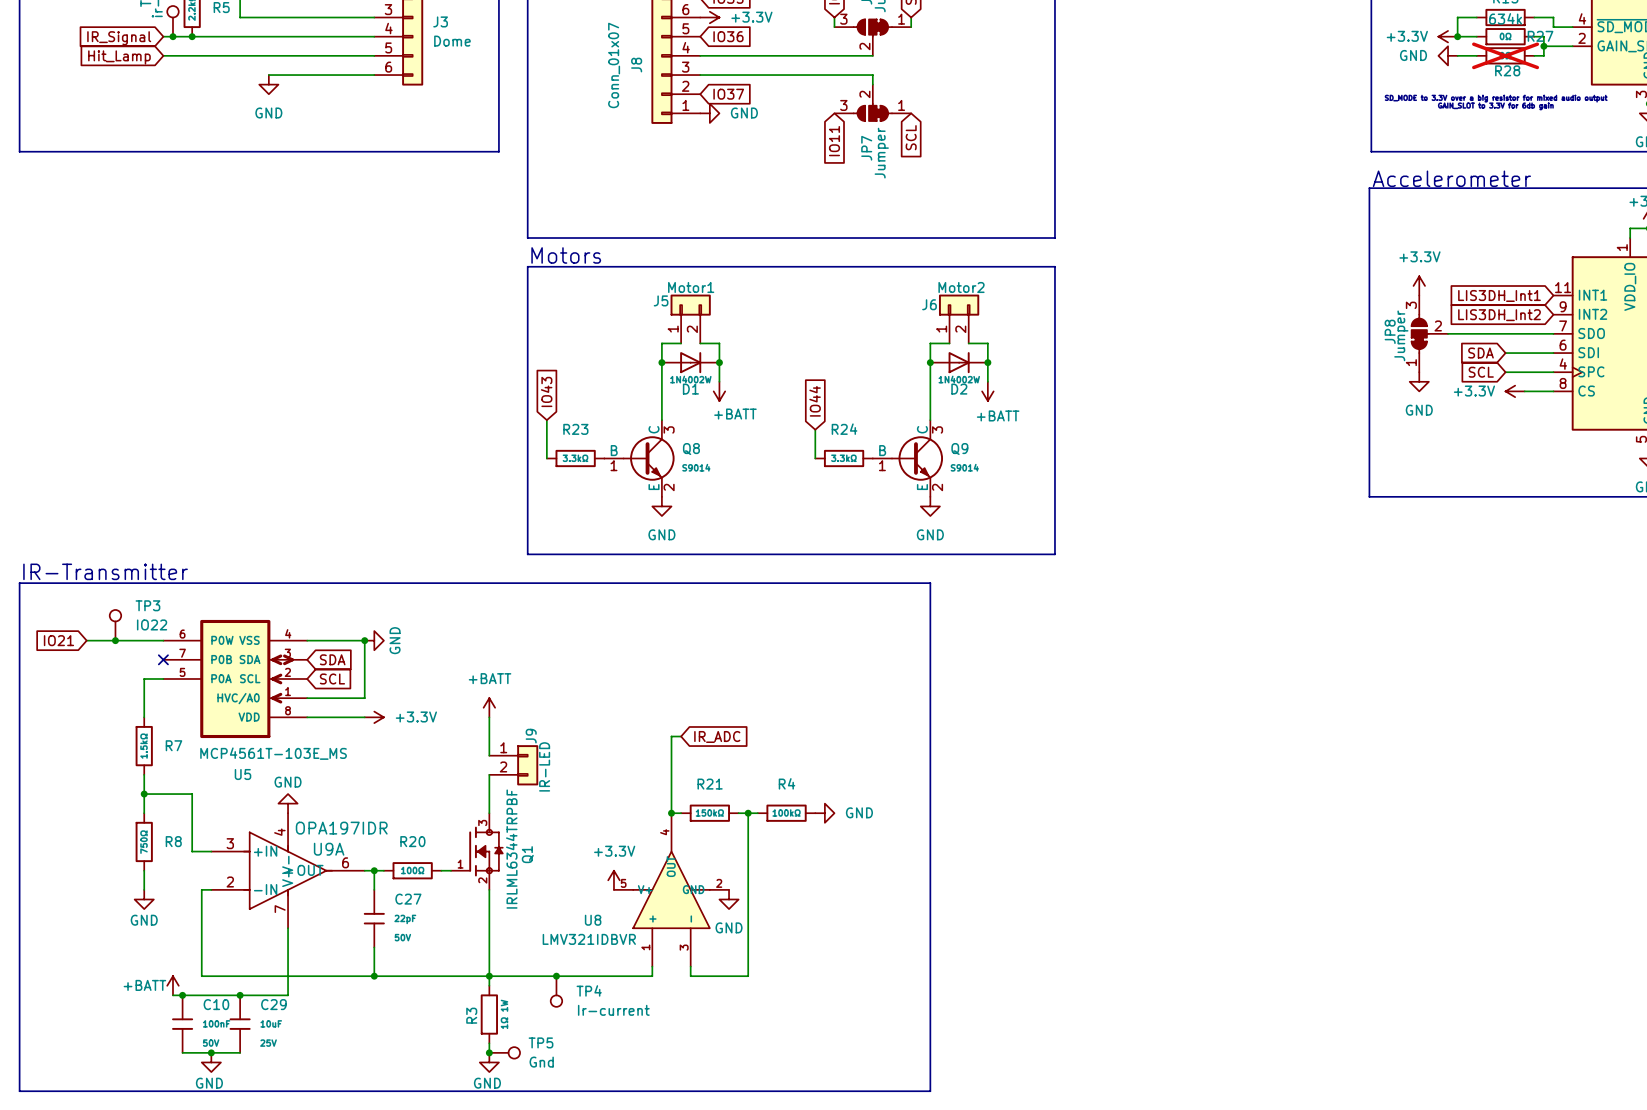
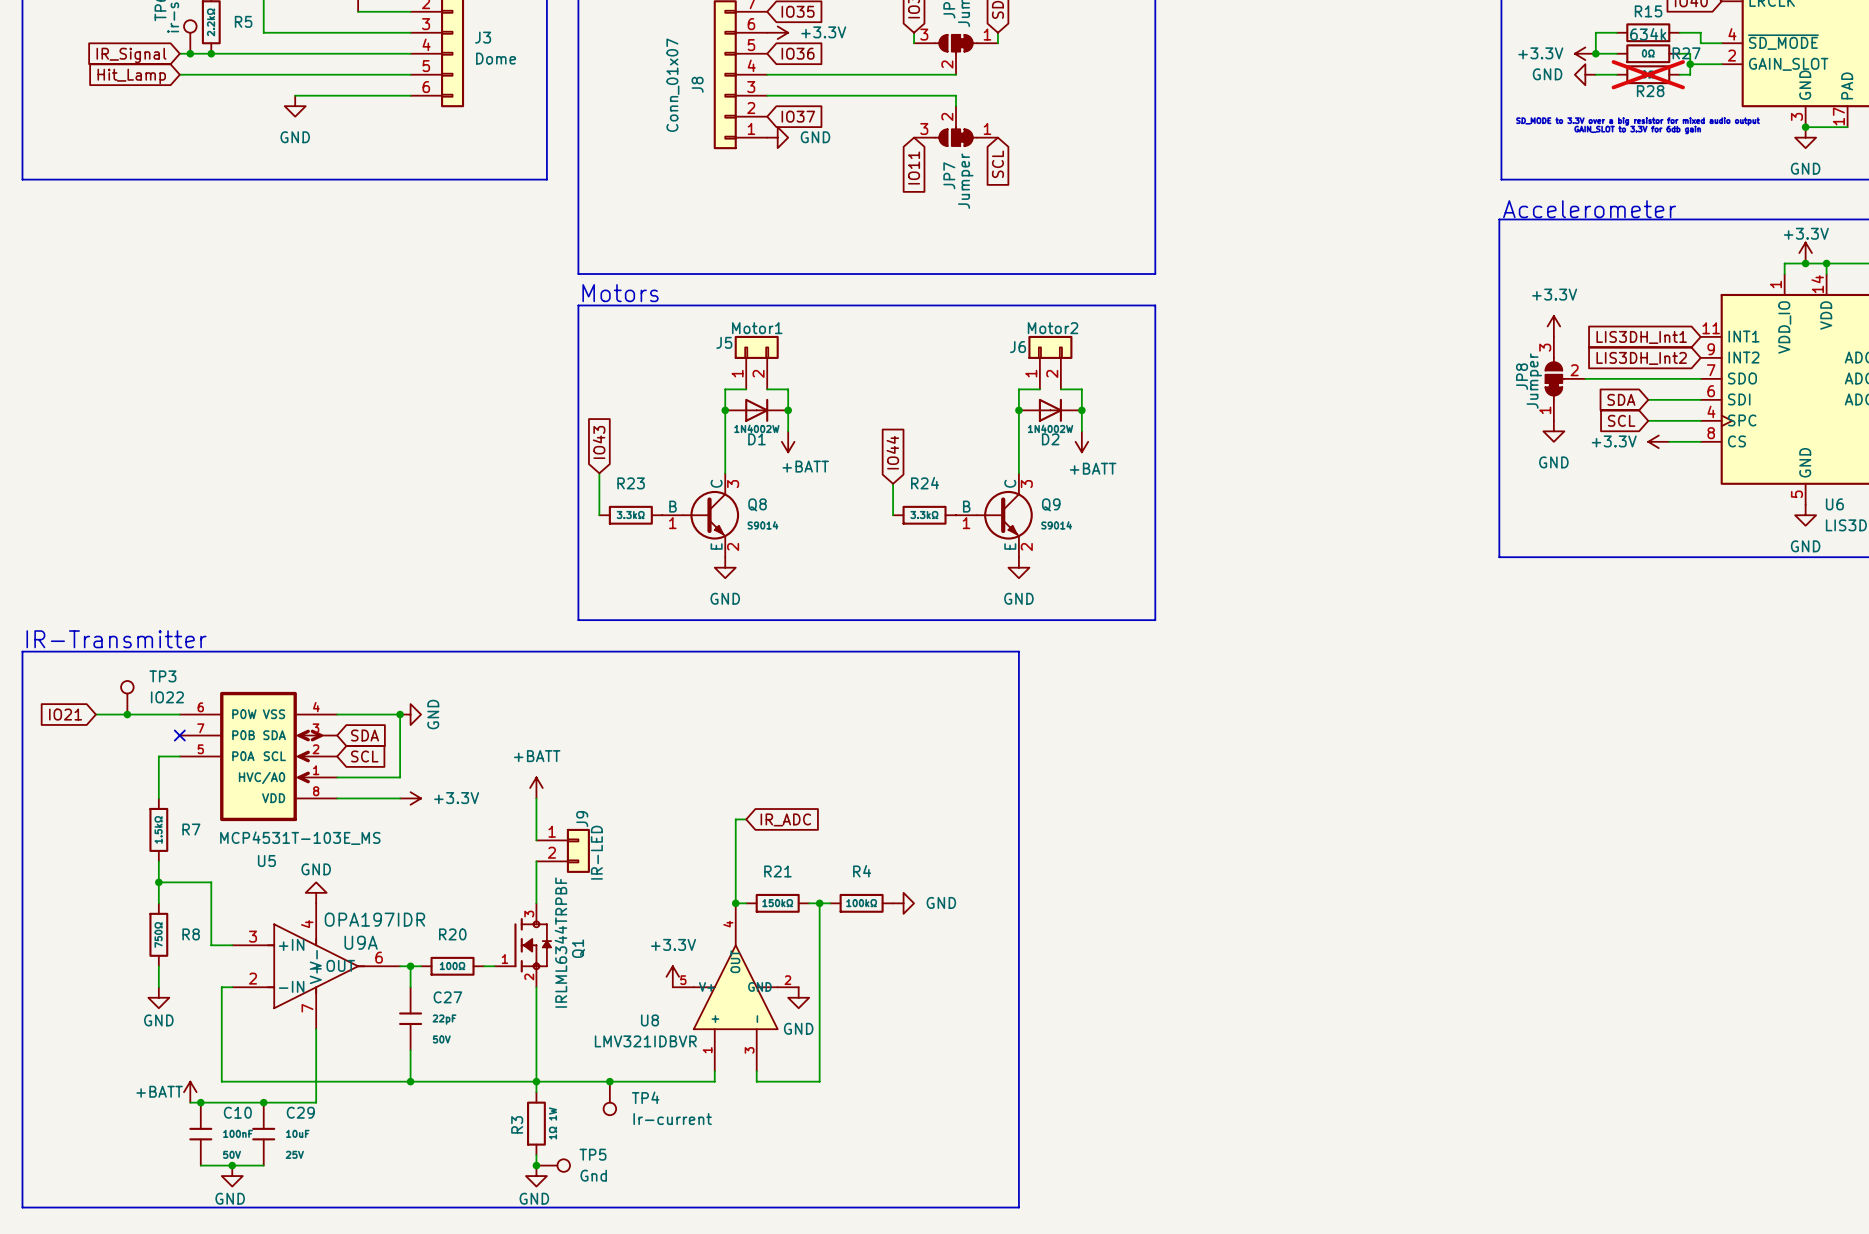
U5 value: MCP4561T-103E_MS (273, 753) -> MCP4531T-103E_MS (300, 838)

